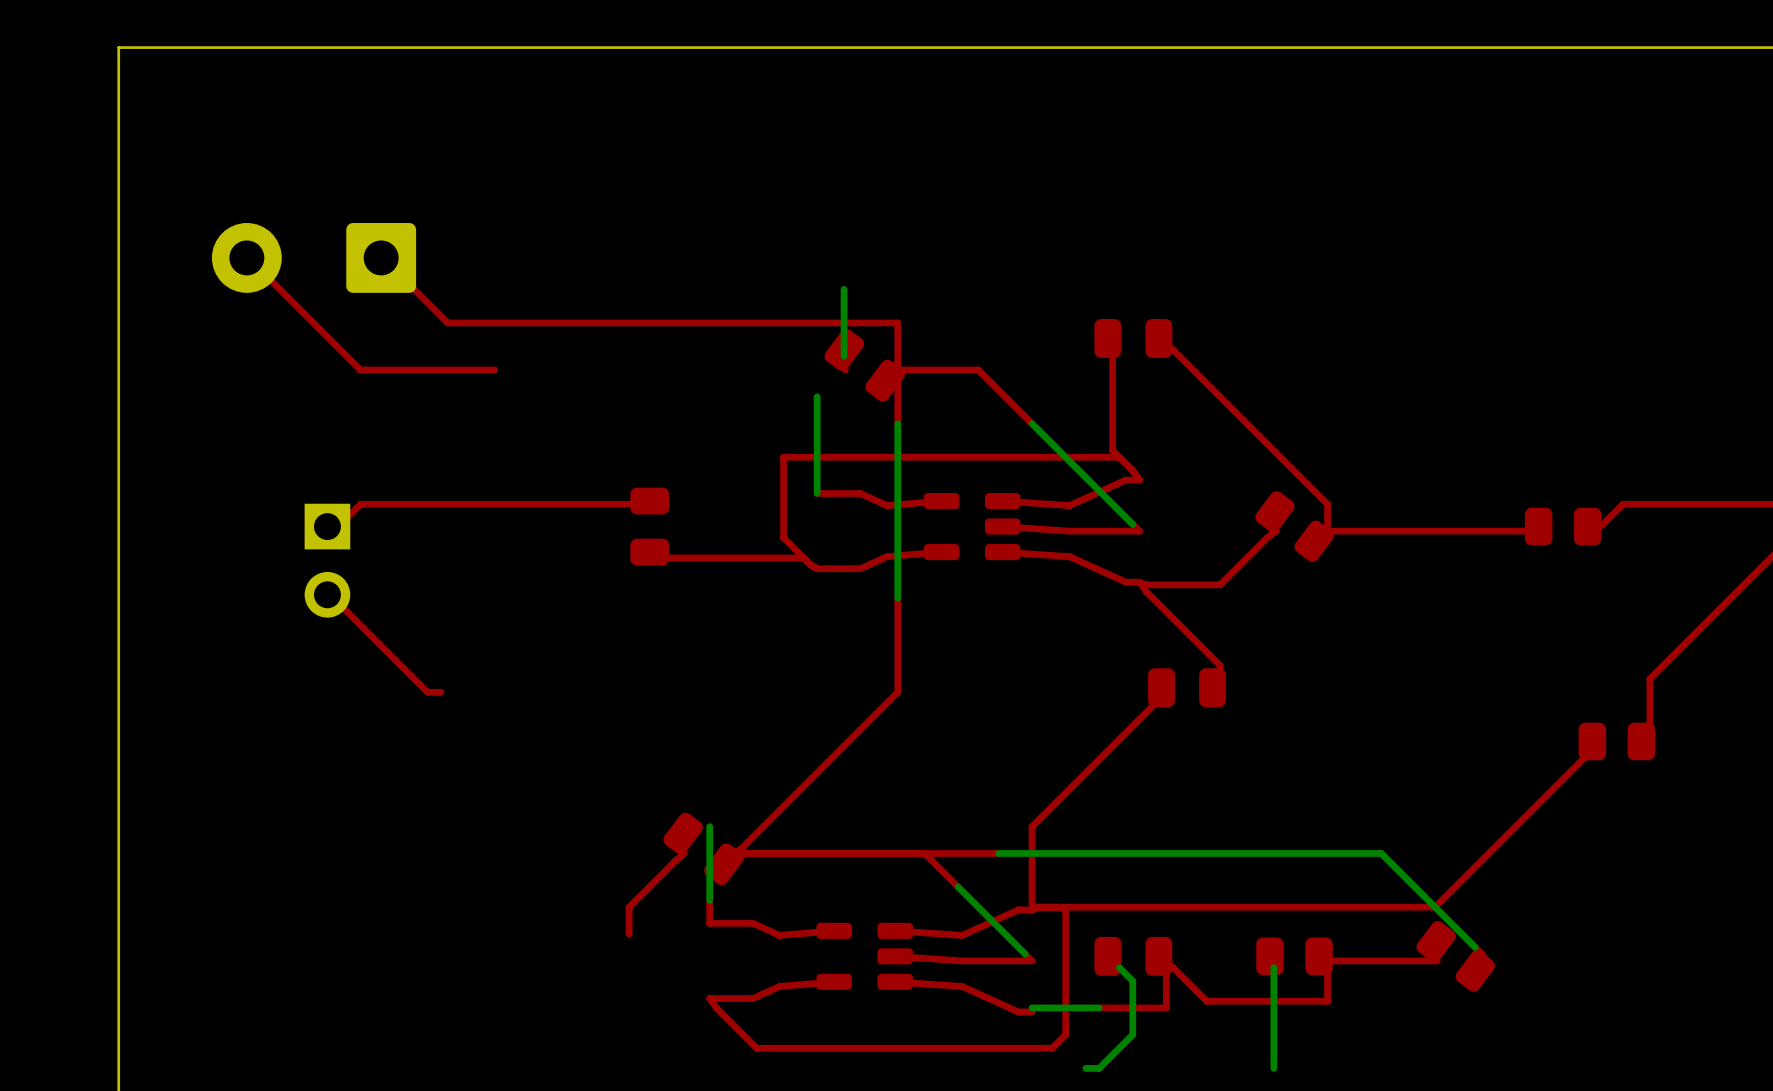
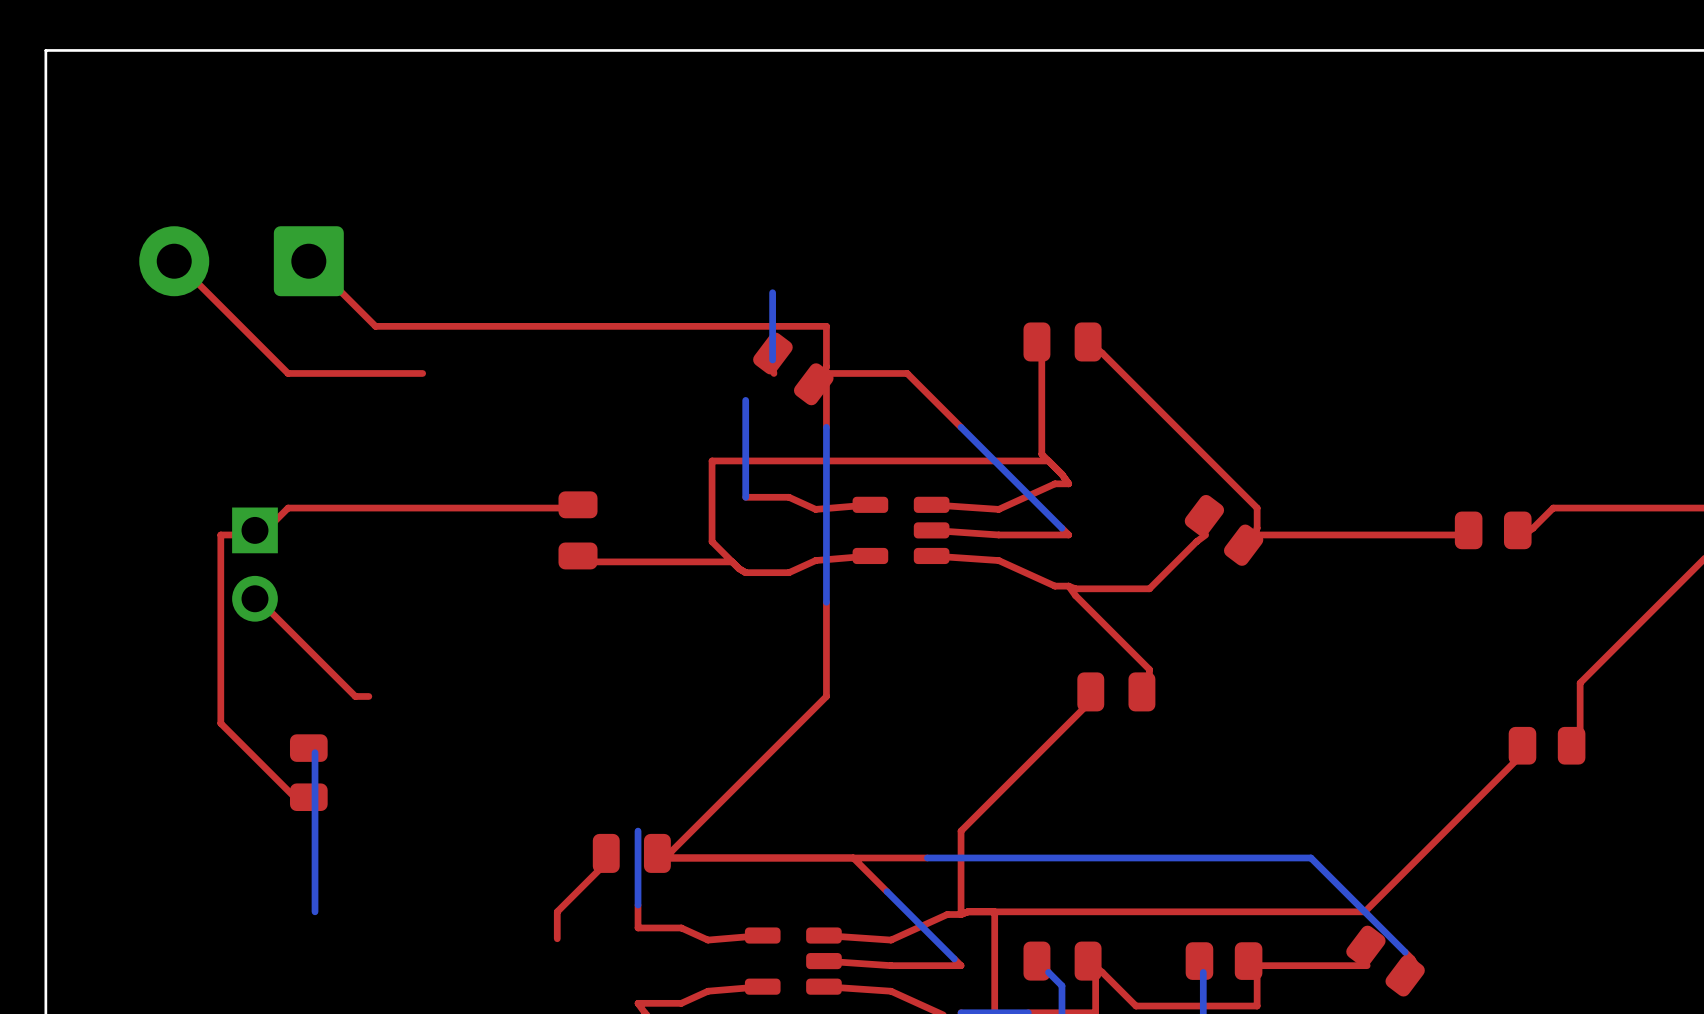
top track: none -> (261, 534) (220, 534) (220, 723) (301, 804) (315, 801)
bottom track: none -> (315, 752) (315, 911)
part: none -> (308, 772)
part rotation: 0° (703, 848) -> 37° counterclockwise (631, 853)

